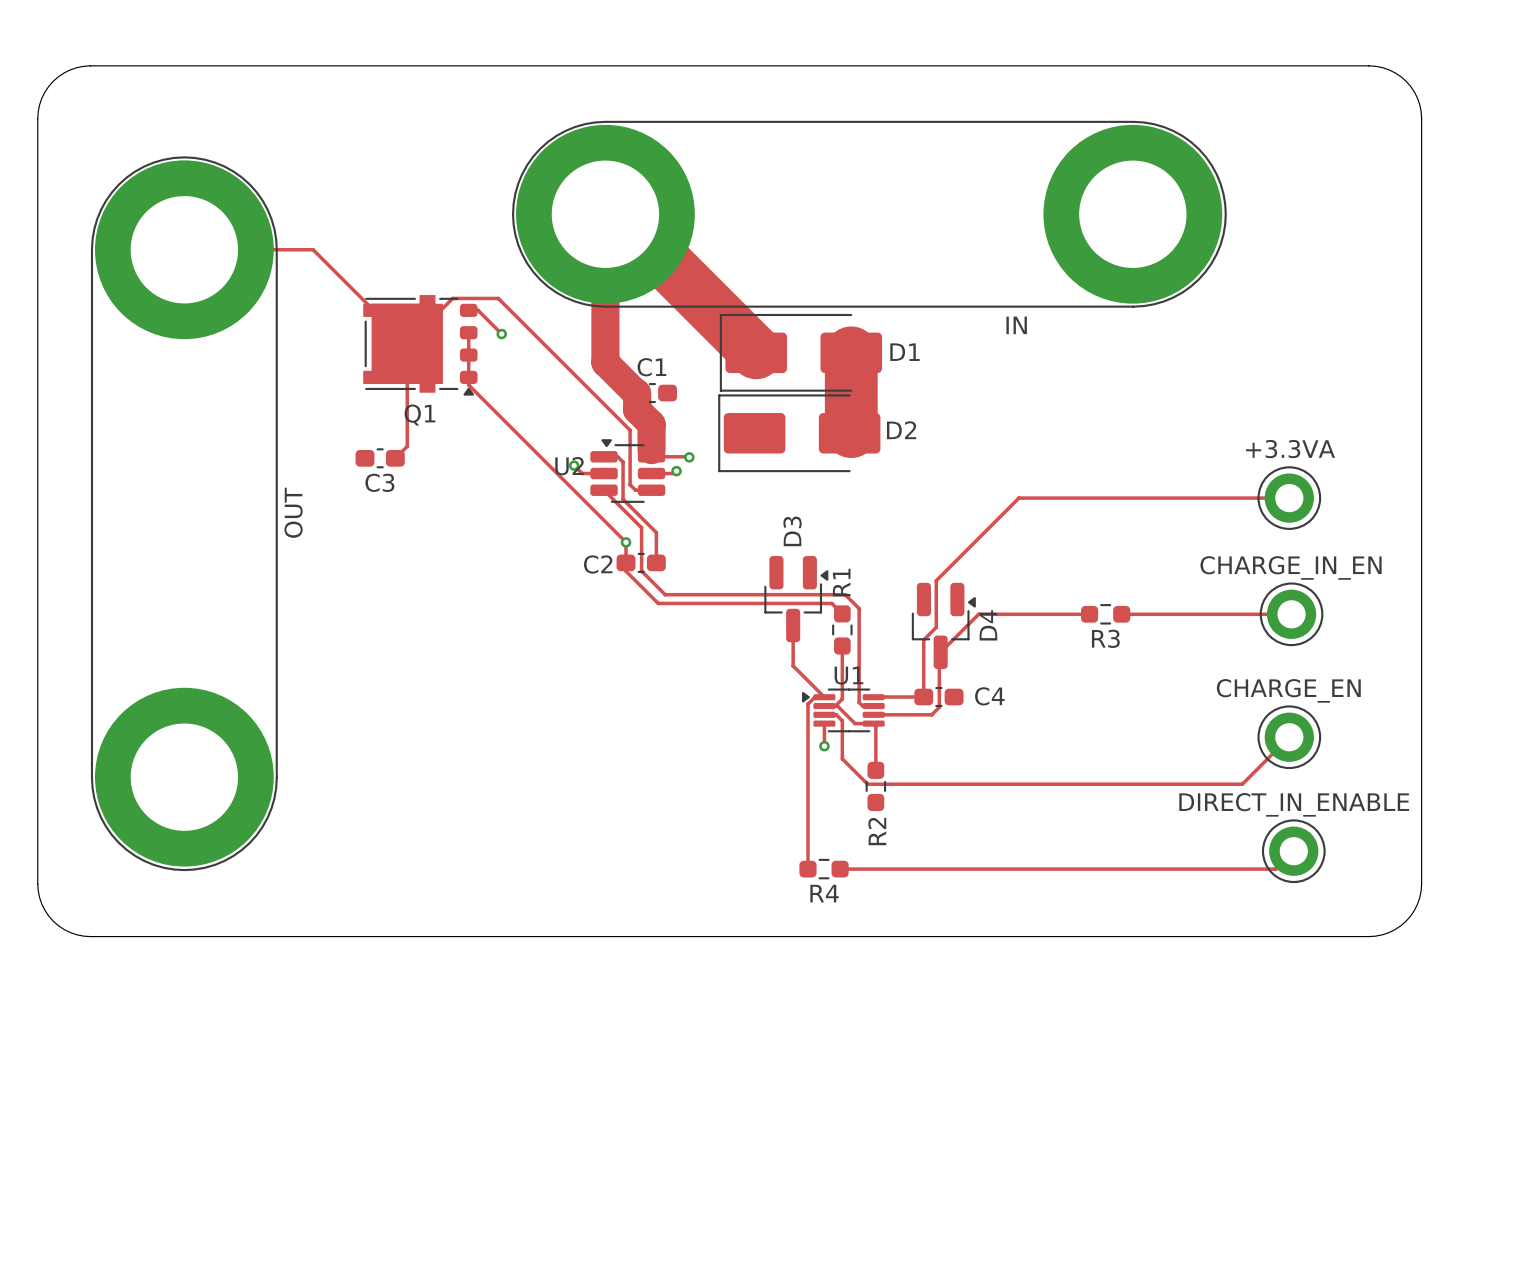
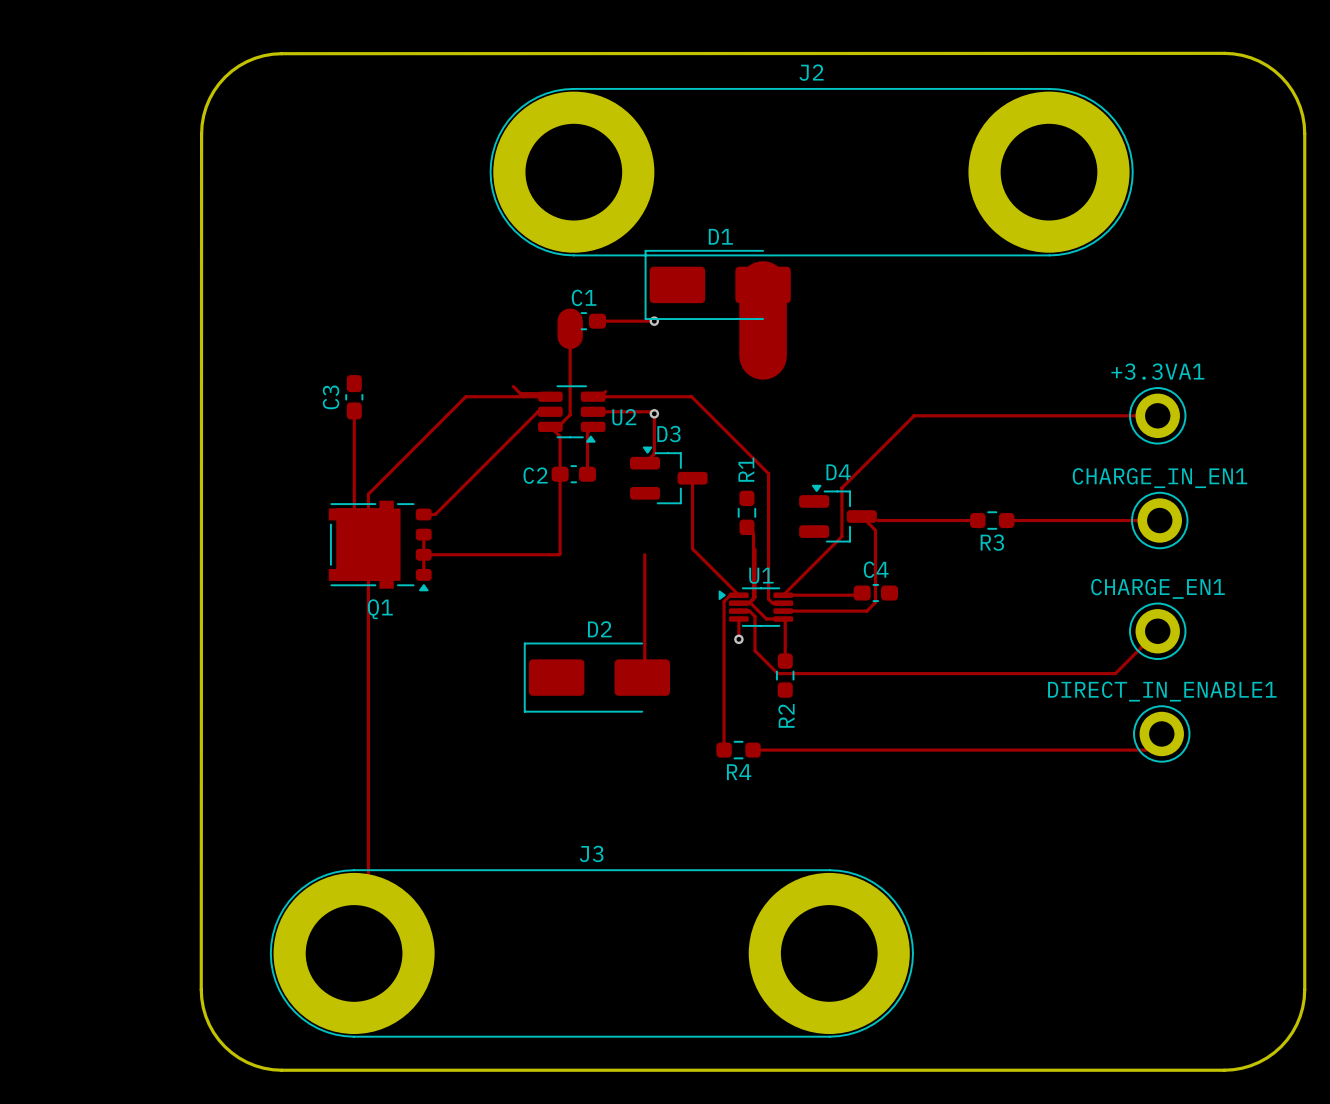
board edge: (90, 65) (1368, 65) (1382, 67) (1395, 72) (1406, 81) (1414, 92) (1419, 104) (1421, 118) (1421, 883) (1419, 897) (1414, 910) (1406, 921) (1395, 929) (1382, 934) (1368, 936) (90, 936) (76, 934) (64, 929) (53, 921) (44, 910) (39, 897) (37, 883) (37, 118) (41, 98) (53, 81) (70, 69) (90, 65) -> (1224, 53) (1251, 57) (1274, 70) (1292, 90) (1300, 107) (1304, 124) (1304, 989) (1300, 1016) (1292, 1032) (1281, 1046) (1267, 1057) (1250, 1065) (1224, 1070) (281, 1070) (263, 1068) (246, 1062) (224, 1046) (209, 1024) (203, 1007) (201, 989) (201, 133) (203, 116) (209, 99) (225, 77) (239, 65) (255, 58) (281, 53) (1224, 53)
IN: (869, 214) -> none
J2: none -> (811, 172)
track: (184, 249) (313, 249) (407, 343) -> none
track: (468, 310) (478, 310) (501, 334) -> none
track: (468, 332) (468, 385) (626, 542) -> none
via: (501, 334) -> none
track: (407, 343) (407, 446) (395, 458) -> none
track: (407, 343) (452, 298) (498, 298) (630, 430) (630, 484) (635, 490) (651, 490) -> none
Q1 position: (420, 345) -> (380, 546)
track: (756, 352) (617, 214) (605, 214) (605, 362) (635, 393) -> none
D1 name position: D1 (904, 352) -> D1 (720, 236)
track: none -> (597, 321) (654, 321)
via: none -> (654, 321)
track: (637, 409) (651, 424) (651, 450) -> (570, 336) (570, 414) (558, 426) (550, 426) (560, 436) (560, 455)
D2 name position: D2 (901, 430) -> D2 (599, 629)
D2 position: (799, 433) -> (596, 677)
+3.3VA name: +3.3VA (1290, 449) -> +3.3VA1 (1157, 371)
track: (604, 456) (617, 456) (623, 462) (623, 499) (656, 532) -> (593, 426) (587, 432) (587, 446)
track: (651, 456) (689, 457) -> none
via: (689, 457) -> none
C3 rotation: 0° (380, 458) -> 90° clockwise (354, 397)
via: (574, 465) -> none
U2 rotation: 0° (627, 471) -> 180° (571, 414)
via: (676, 471) -> none
track: none -> (558, 396) (465, 396) (368, 494) (368, 939) (354, 953)
track: (604, 490) (641, 527) (641, 571) (665, 594) (845, 594) (859, 608) (859, 702) (862, 706) -> (593, 396) (691, 396) (768, 473) (768, 599) (773, 603)
track: none -> (354, 410) (354, 530) (368, 544)
track: none -> (550, 411) (538, 411) (435, 514) (423, 514)
track: none -> (593, 411) (652, 411) (654, 413) (654, 453) (645, 463)
via: none -> (654, 413)
OUT: (184, 513) -> none
via: (626, 542) -> none
CHARGE_IN_EN name: CHARGE_IN_EN (1291, 567) -> CHARGE_IN_EN1 (1160, 478)
track: (626, 571) (658, 603) (831, 603) (842, 613) -> (560, 481) (559, 554) (423, 554)
track: (938, 578) (936, 580) (936, 627) (923, 639) (923, 697) (873, 697) -> (841, 488) (841, 536) (783, 595)
D3 rotation: 0° (796, 599) -> 90° counterclockwise (668, 475)
D3 position: (796, 599) -> (668, 475)
track: (978, 614) (939, 653) (939, 707) (931, 714) -> (861, 516) (875, 530) (875, 602) (866, 611) (835, 611)
track: none -> (746, 527) (753, 533) (753, 599) (749, 603)
track: (793, 625) (793, 665) -> (692, 478) (692, 548) (710, 567)
D4 rotation: 0° (943, 625) -> 90° counterclockwise (837, 513)
track: none -> (423, 534) (423, 574)
R1 position: (842, 629) -> (746, 512)
track: none -> (644, 554) (644, 675) (642, 677)
CHARGE_EN name: CHARGE_EN (1288, 690) -> CHARGE_EN1 (1158, 588)
track: none -> (862, 593) (859, 595) (783, 595)
C4 name position: C4 (989, 696) -> C4 (876, 569)
C4 position: (938, 697) -> (875, 593)
DIRECT_IN_ENABLE name: DIRECT_IN_ENABLE (1294, 804) -> DIRECT_IN_ENABLE1 (1162, 691)
J3: none -> (591, 953)

